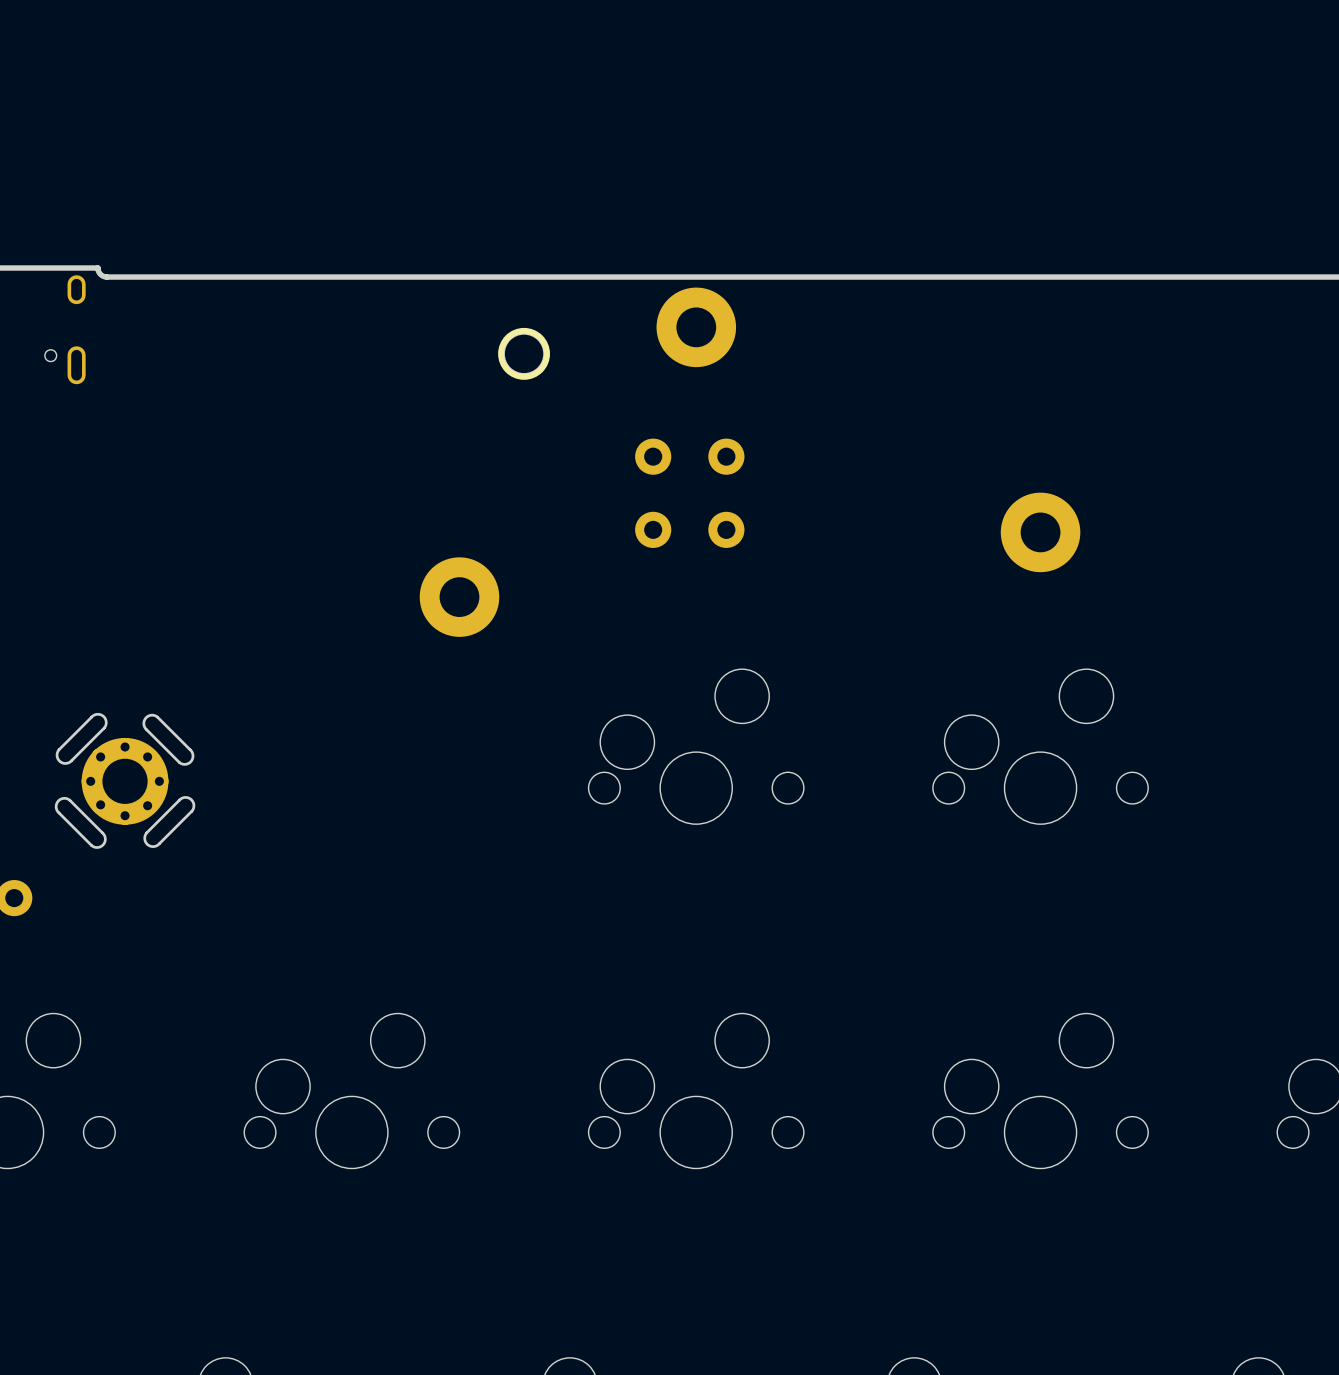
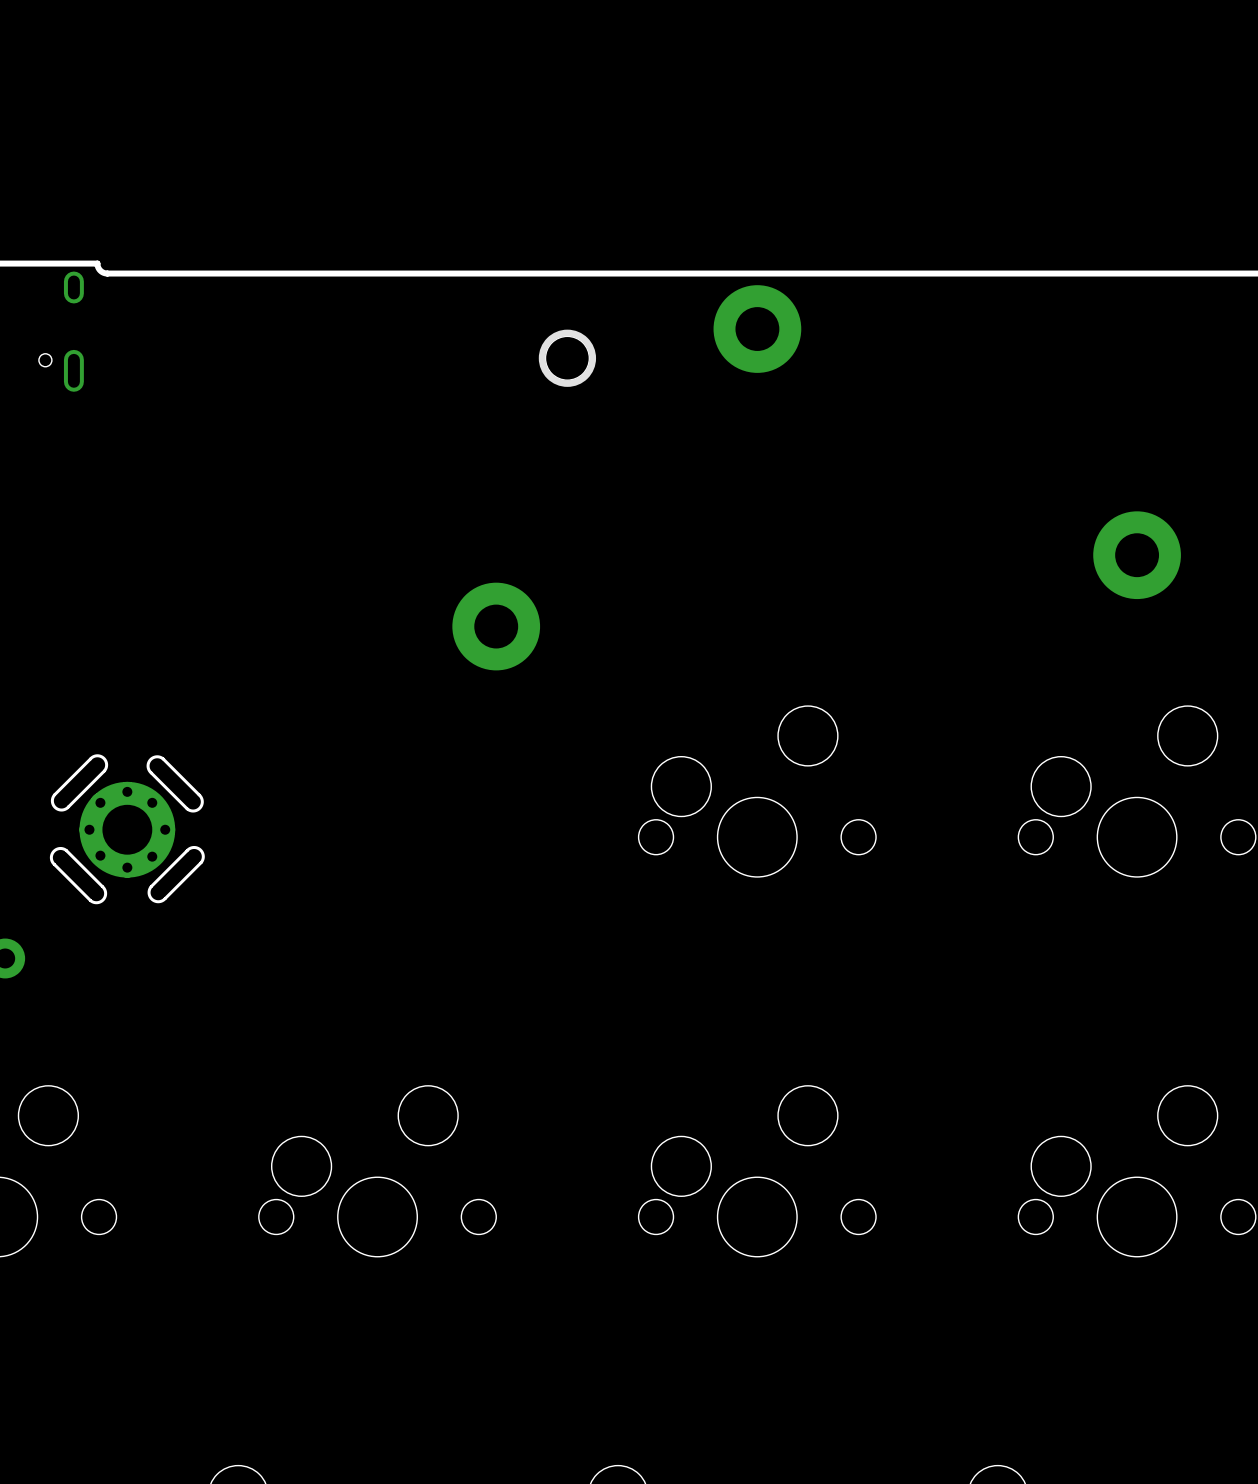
part: (653, 456) -> none
part: (726, 456) -> none
part: (653, 529) -> none
part: (726, 529) -> none

